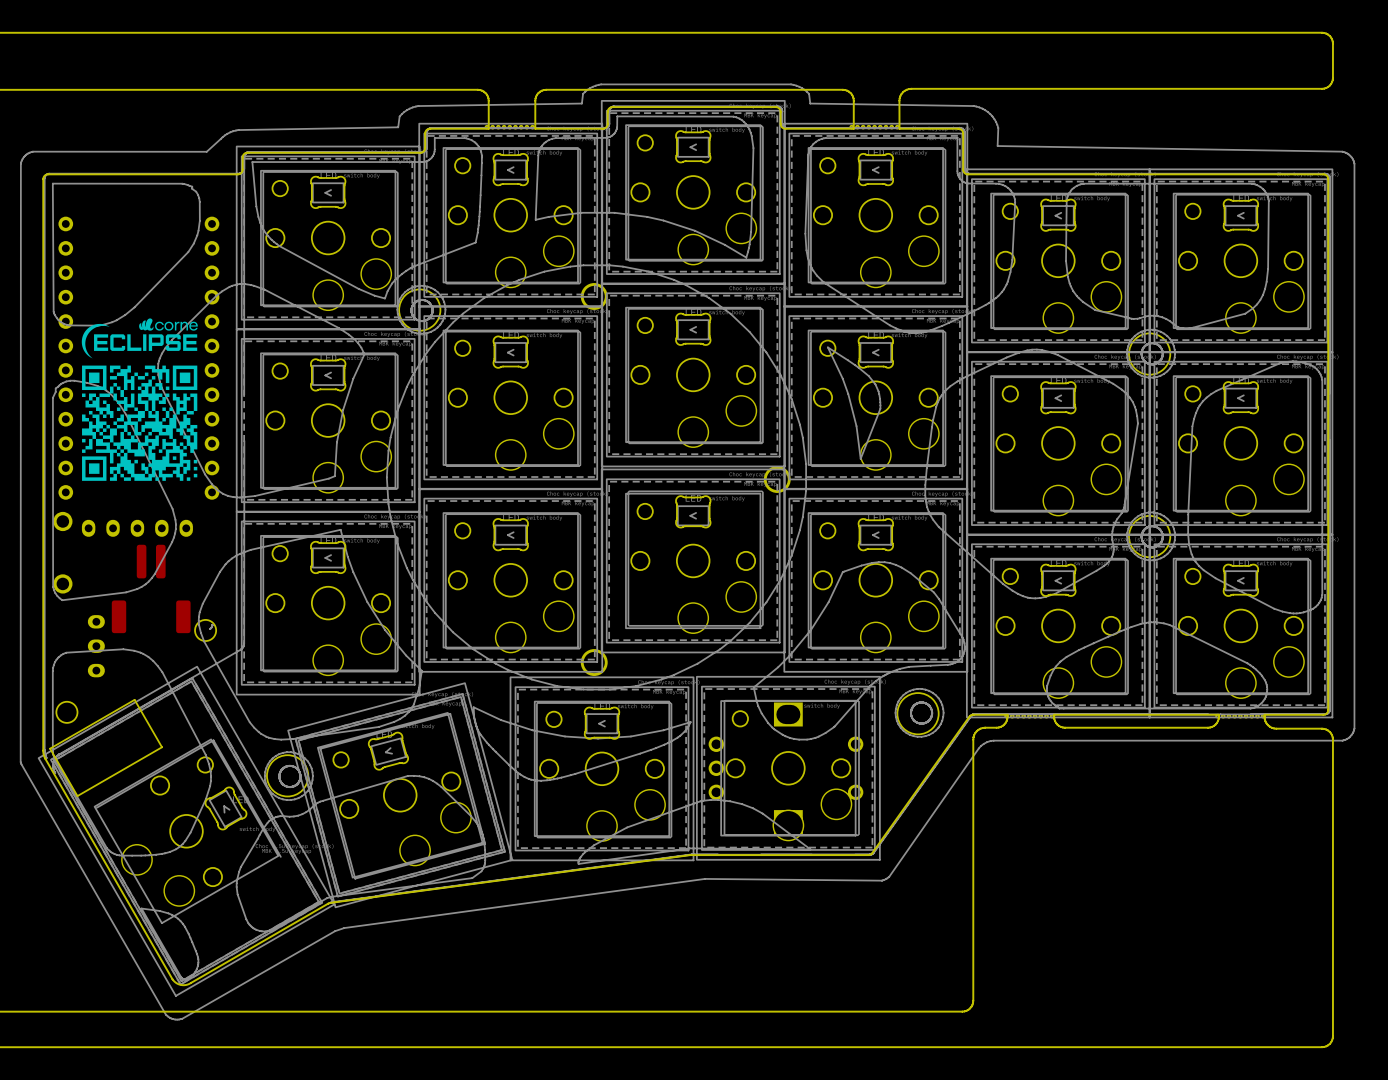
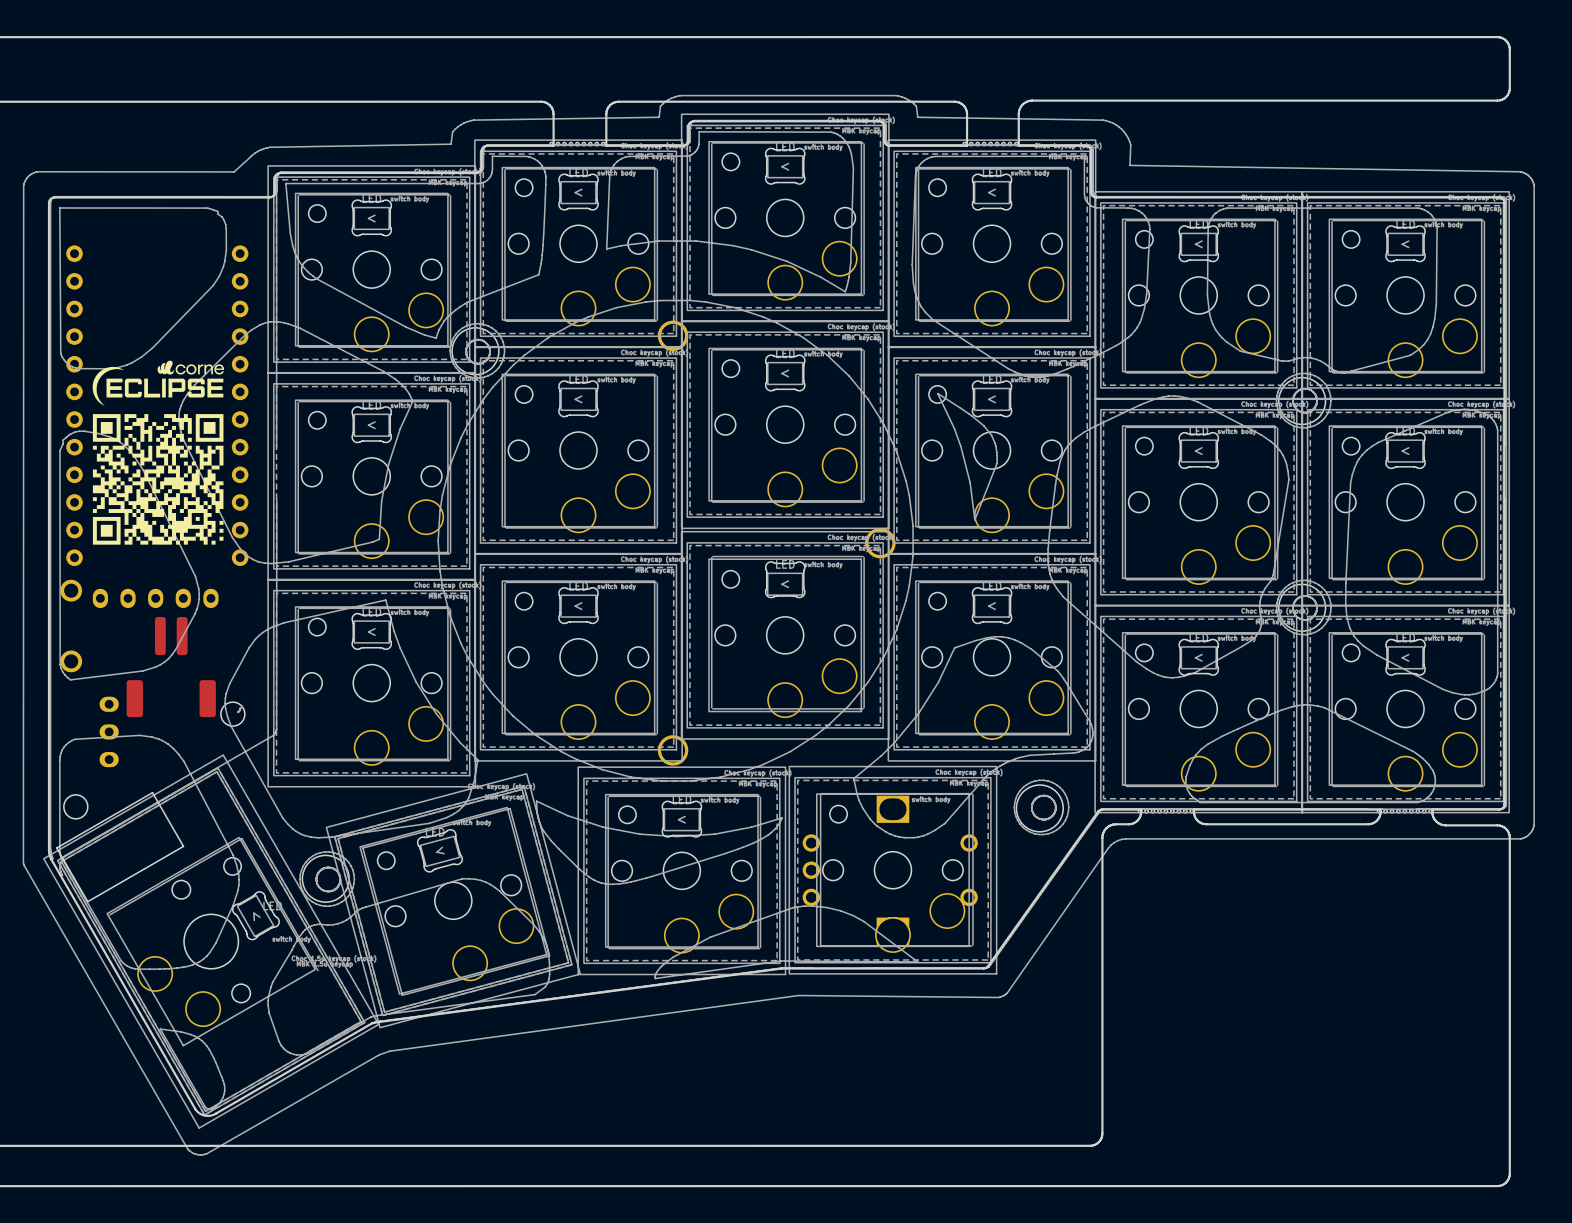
part footprint: [38, 666, 335, 997] -> [43, 754, 380, 1129]

